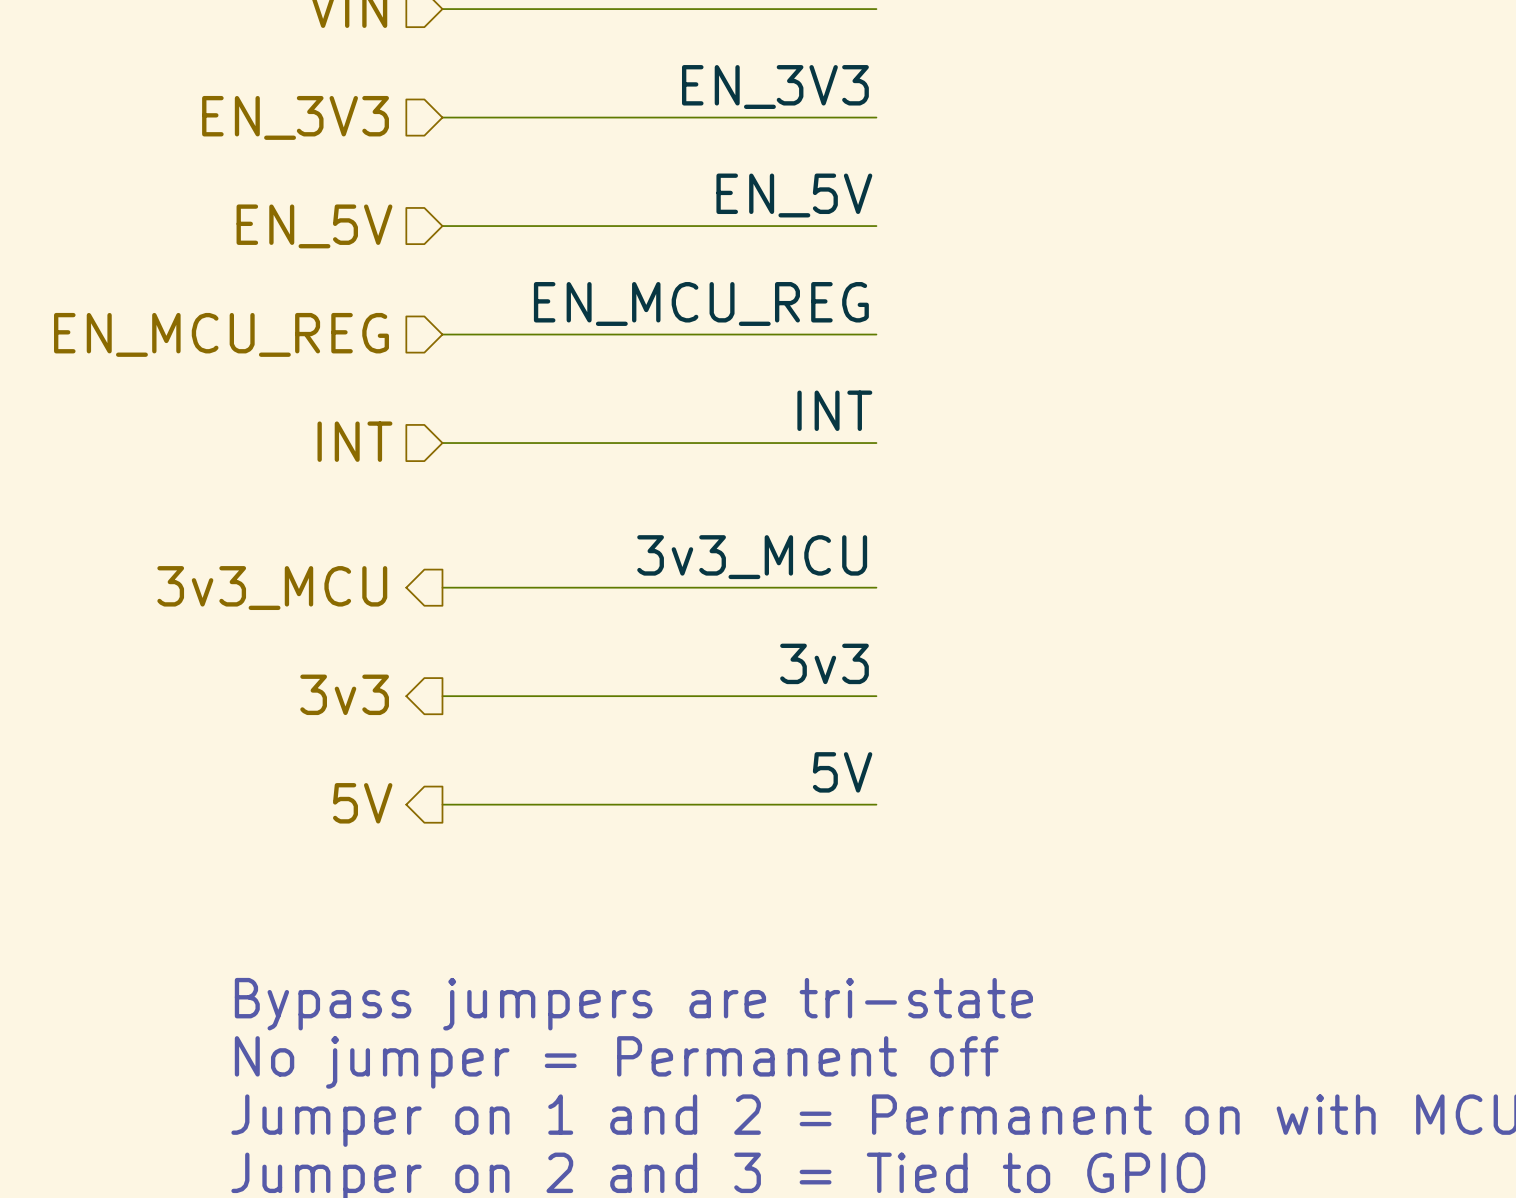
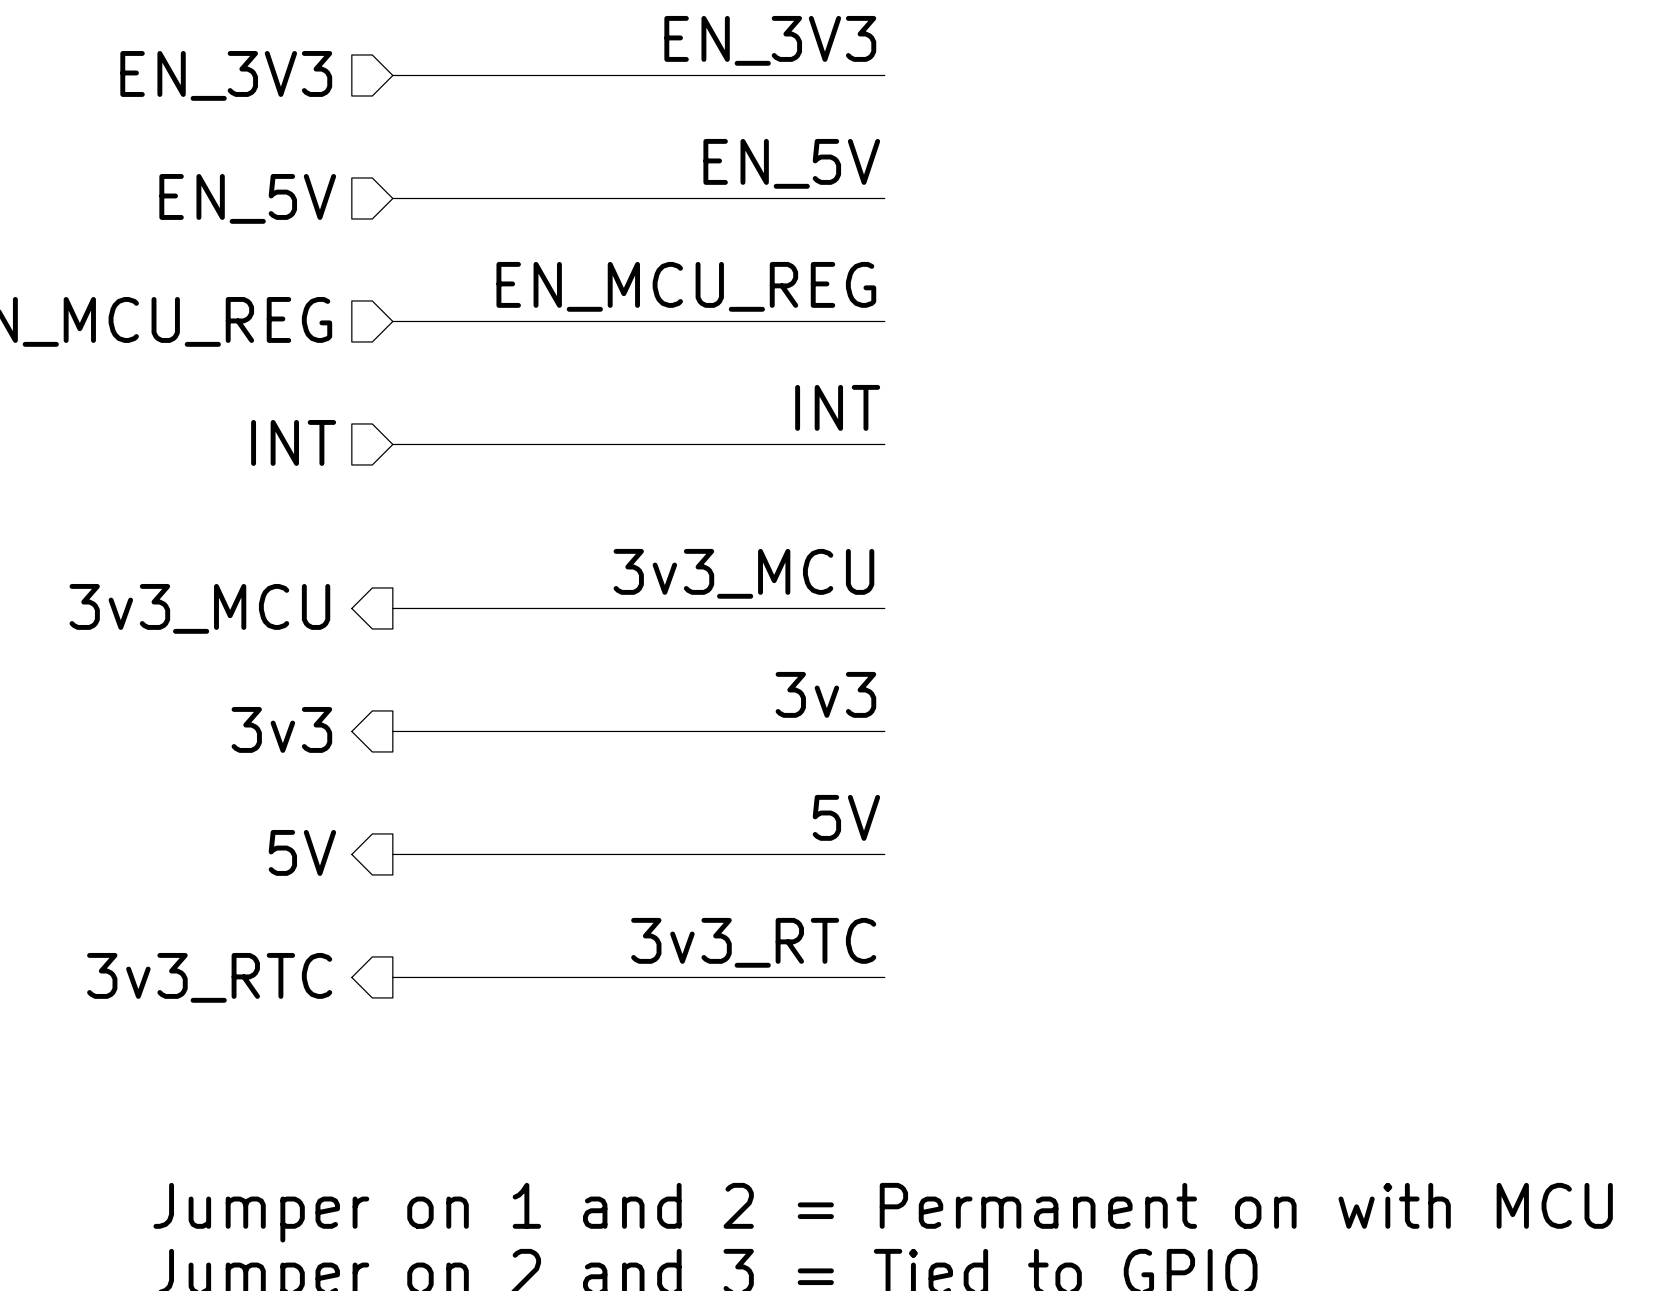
label: none -> 3v3_RTC (753, 942)
hierarchical label: none -> 3v3_RTC (209, 977)
wire: none -> (392, 977) (884, 977)
text: Bypass jumpers are tri-state (633, 1004) -> none
text: No jumper = Permanent off (616, 1062) -> none

